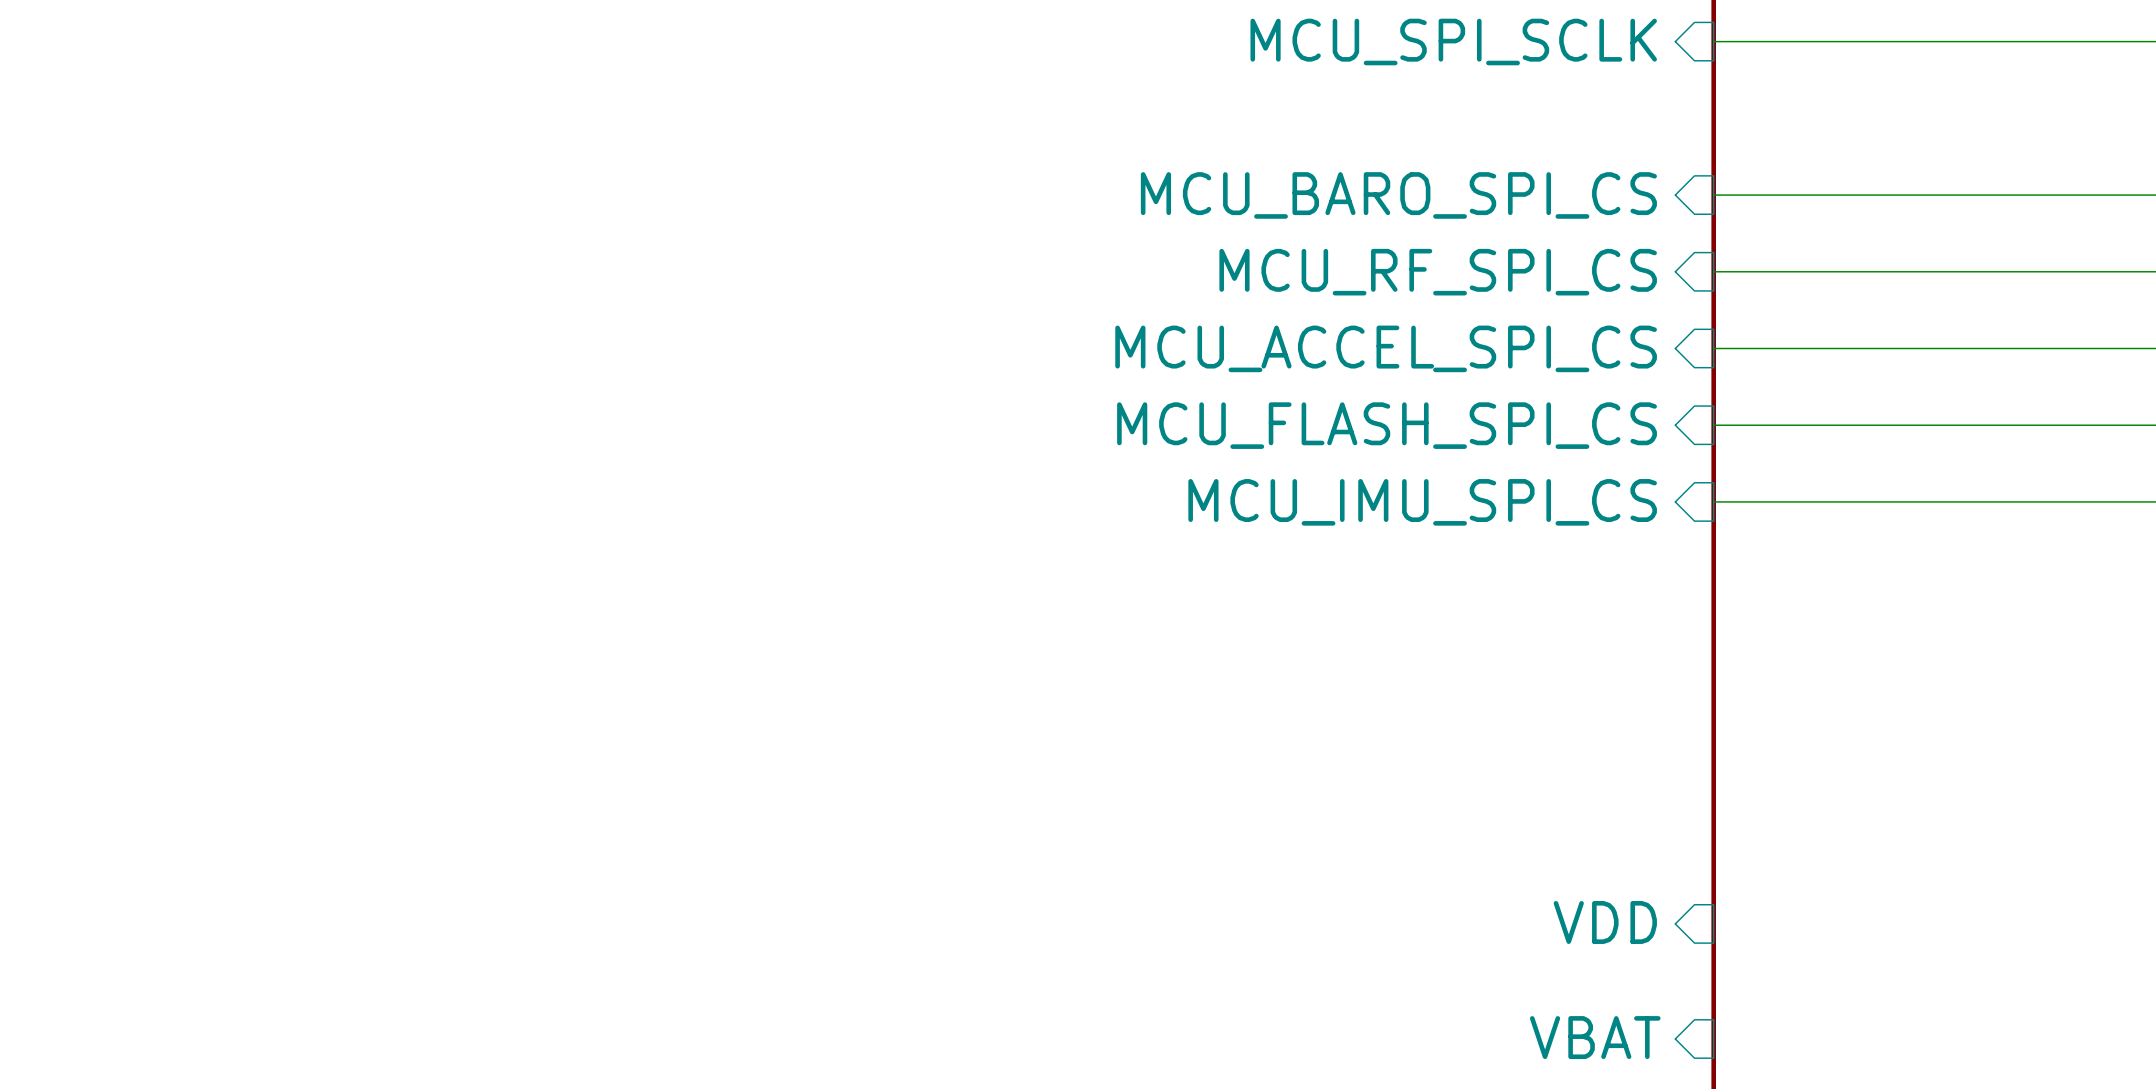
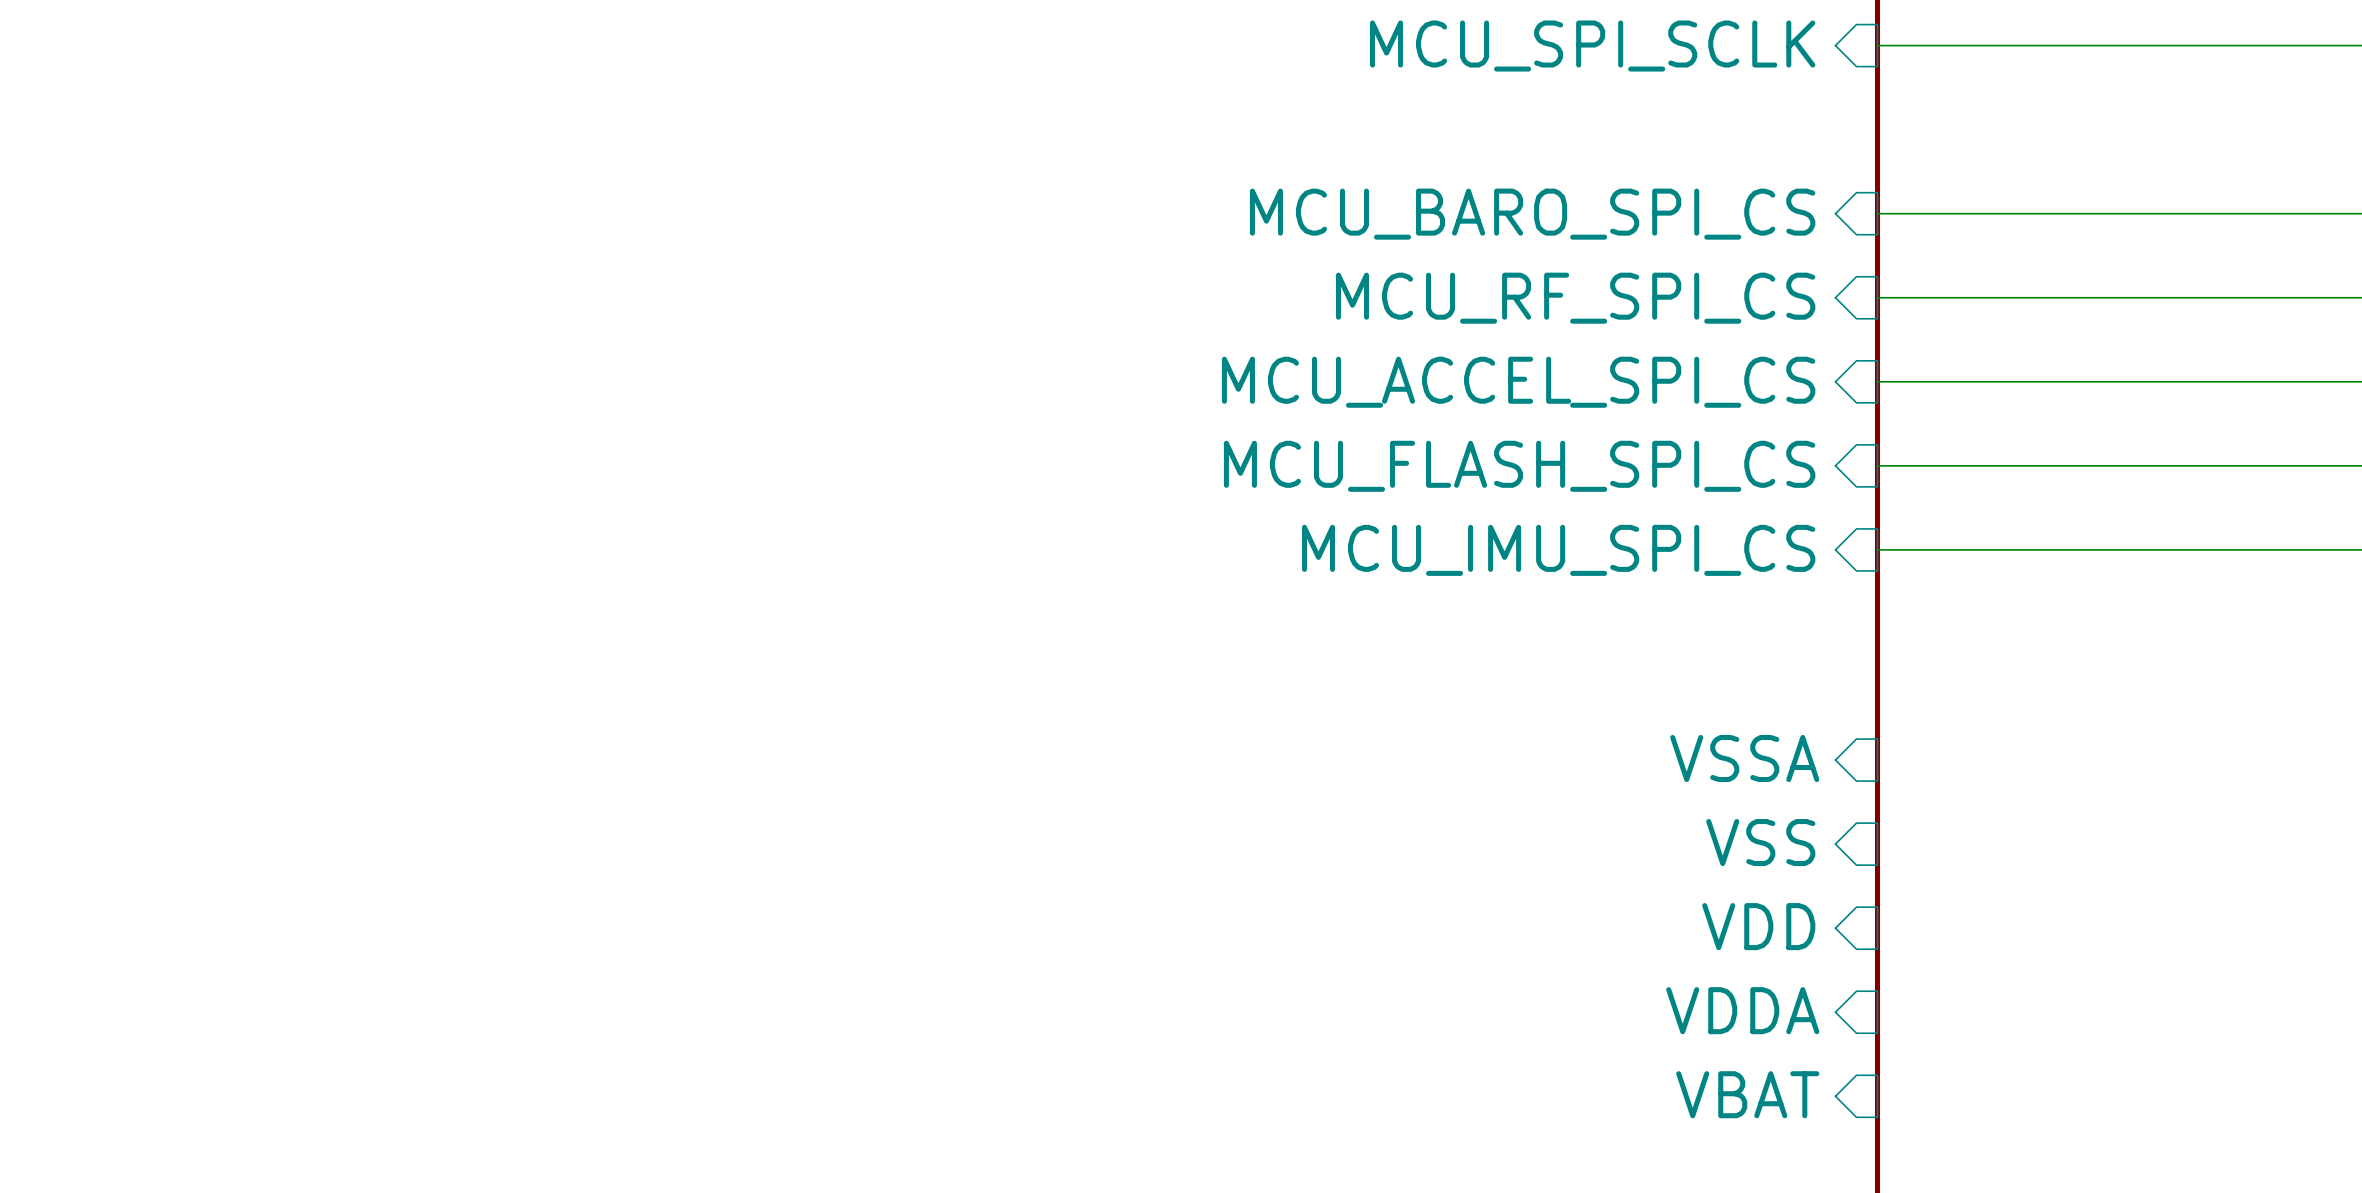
sheet pin: none -> VSSA (1744, 758)
sheet pin: none -> VSS (1760, 842)
sheet pin: none -> VDD (1758, 926)
sheet pin: VDD (1605, 922) -> VDDA (1742, 1010)
sheet pin position: VBAT (1595, 1037) -> VBAT (1747, 1094)

